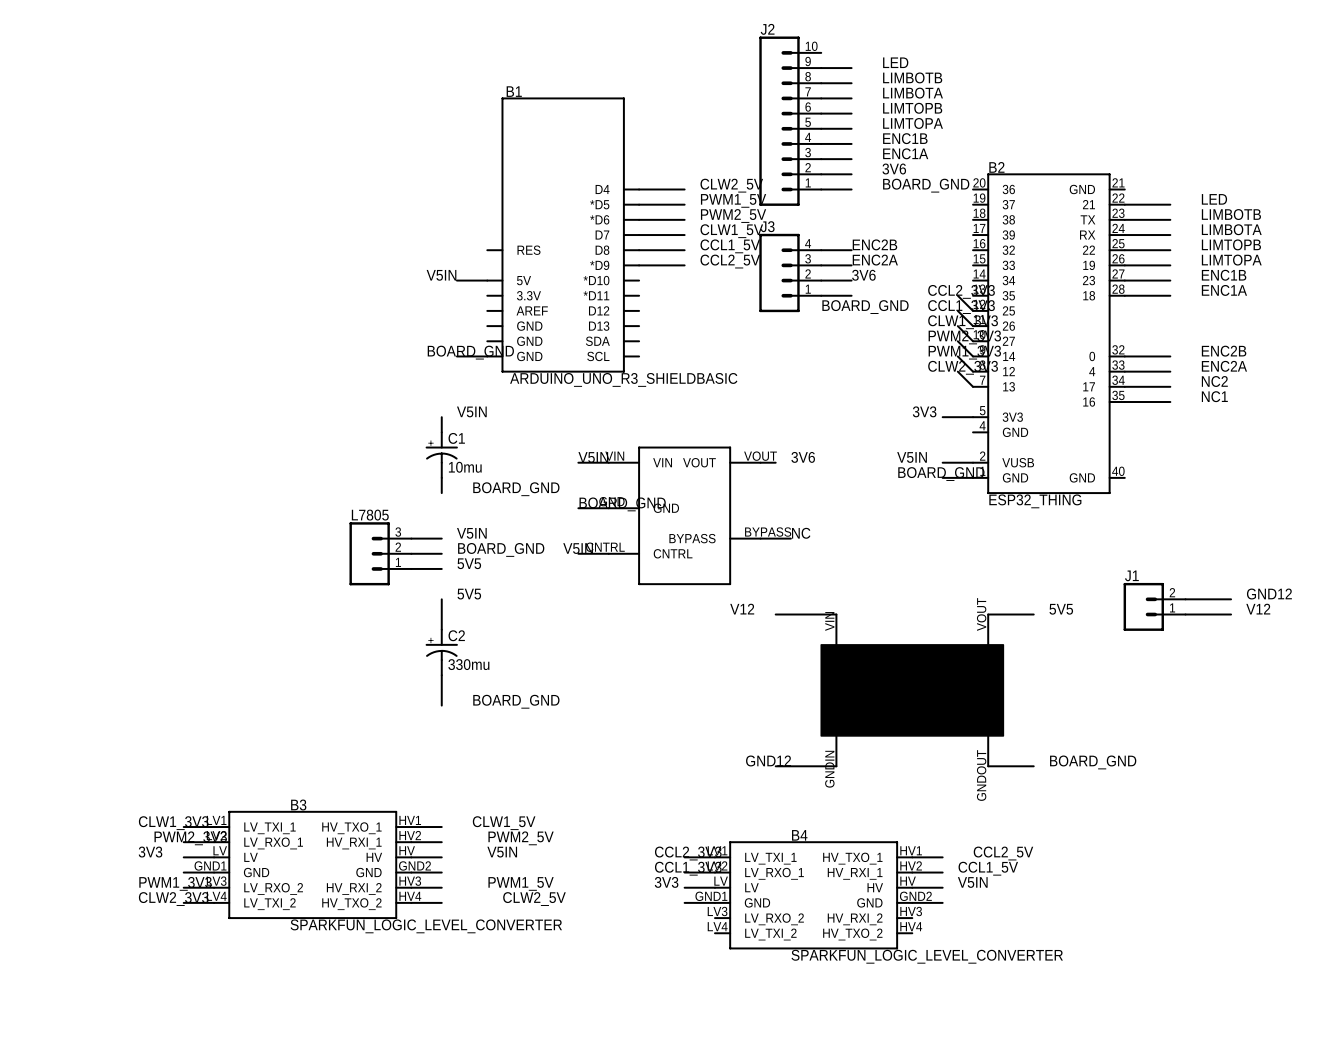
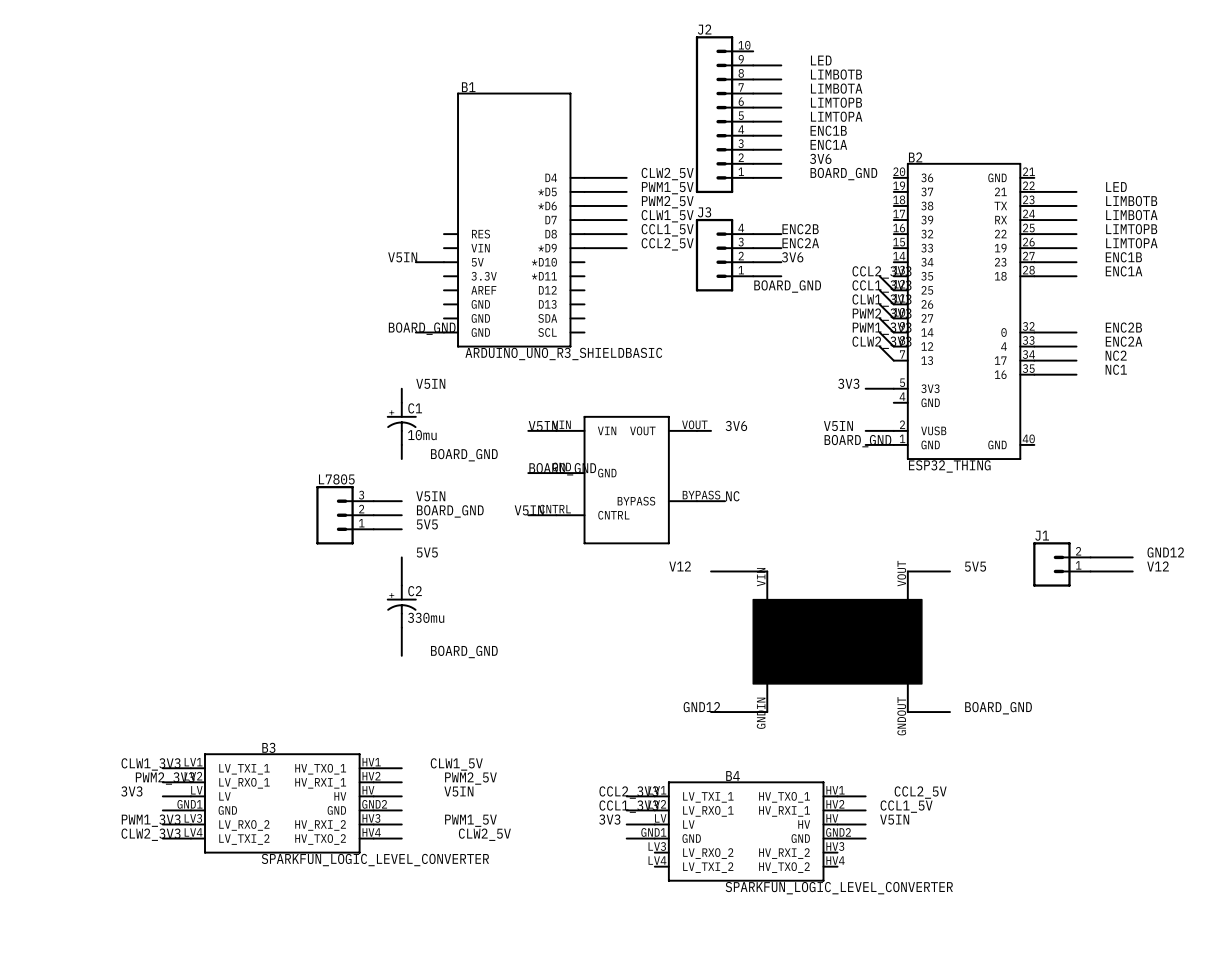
B1 symbol: [487, 97, 640, 373] -> [443, 92, 585, 348]

